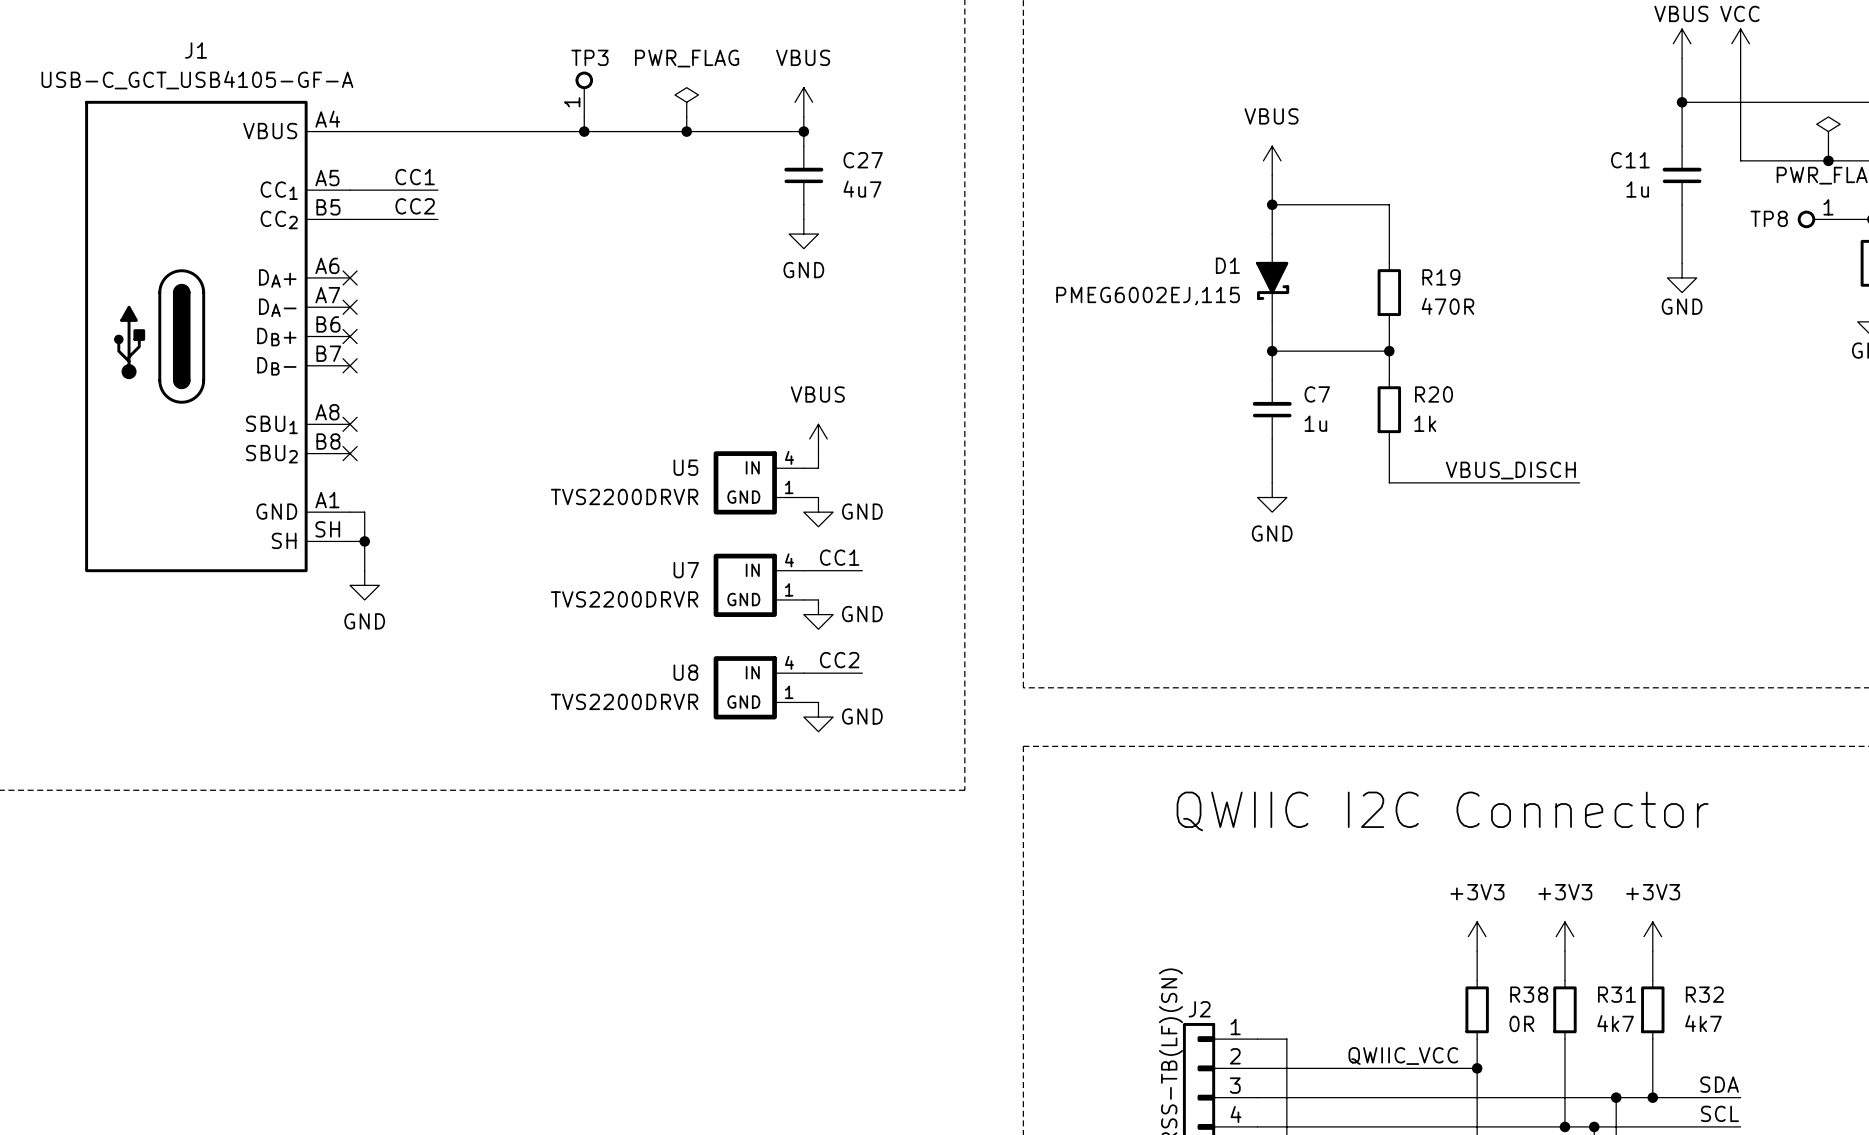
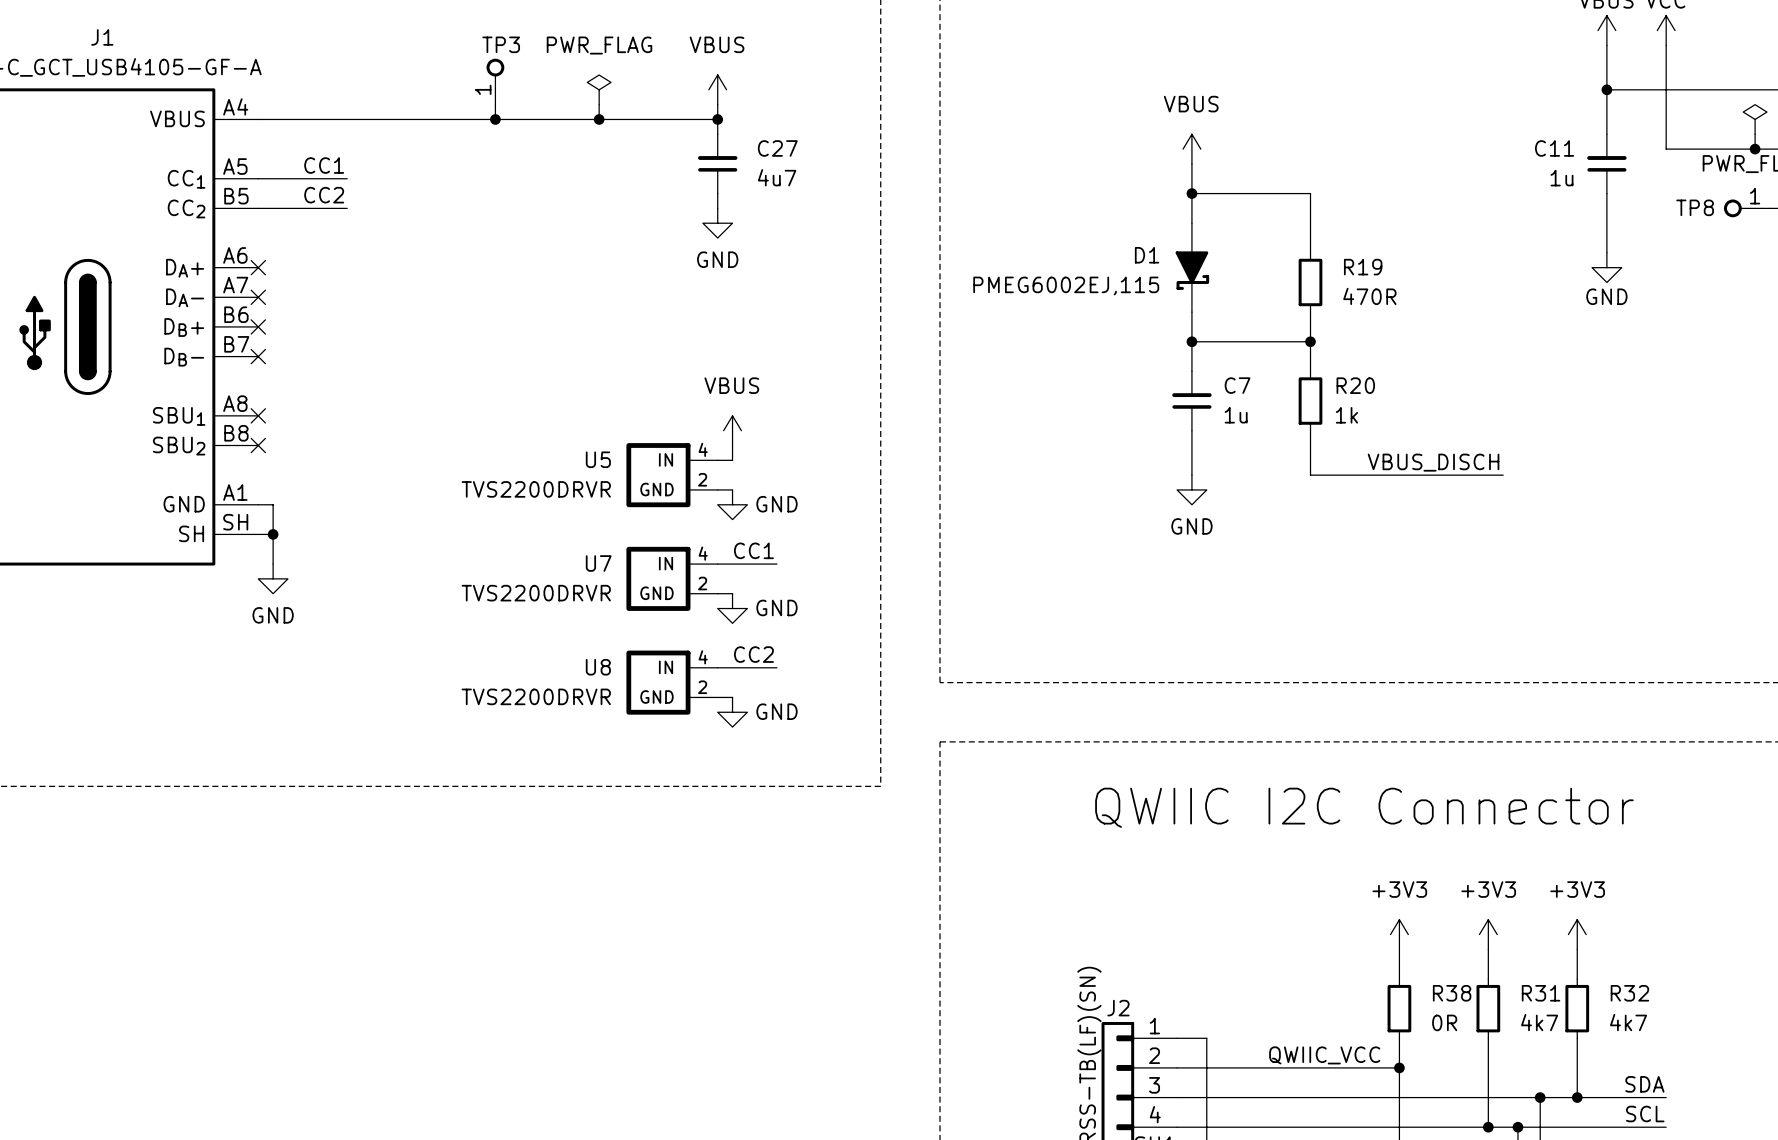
U5 pin number: 1 (789, 487) -> 2 (702, 479)
U7 pin number: 1 (789, 589) -> 2 (702, 583)
U8 pin number: 1 (789, 692) -> 2 (702, 687)

